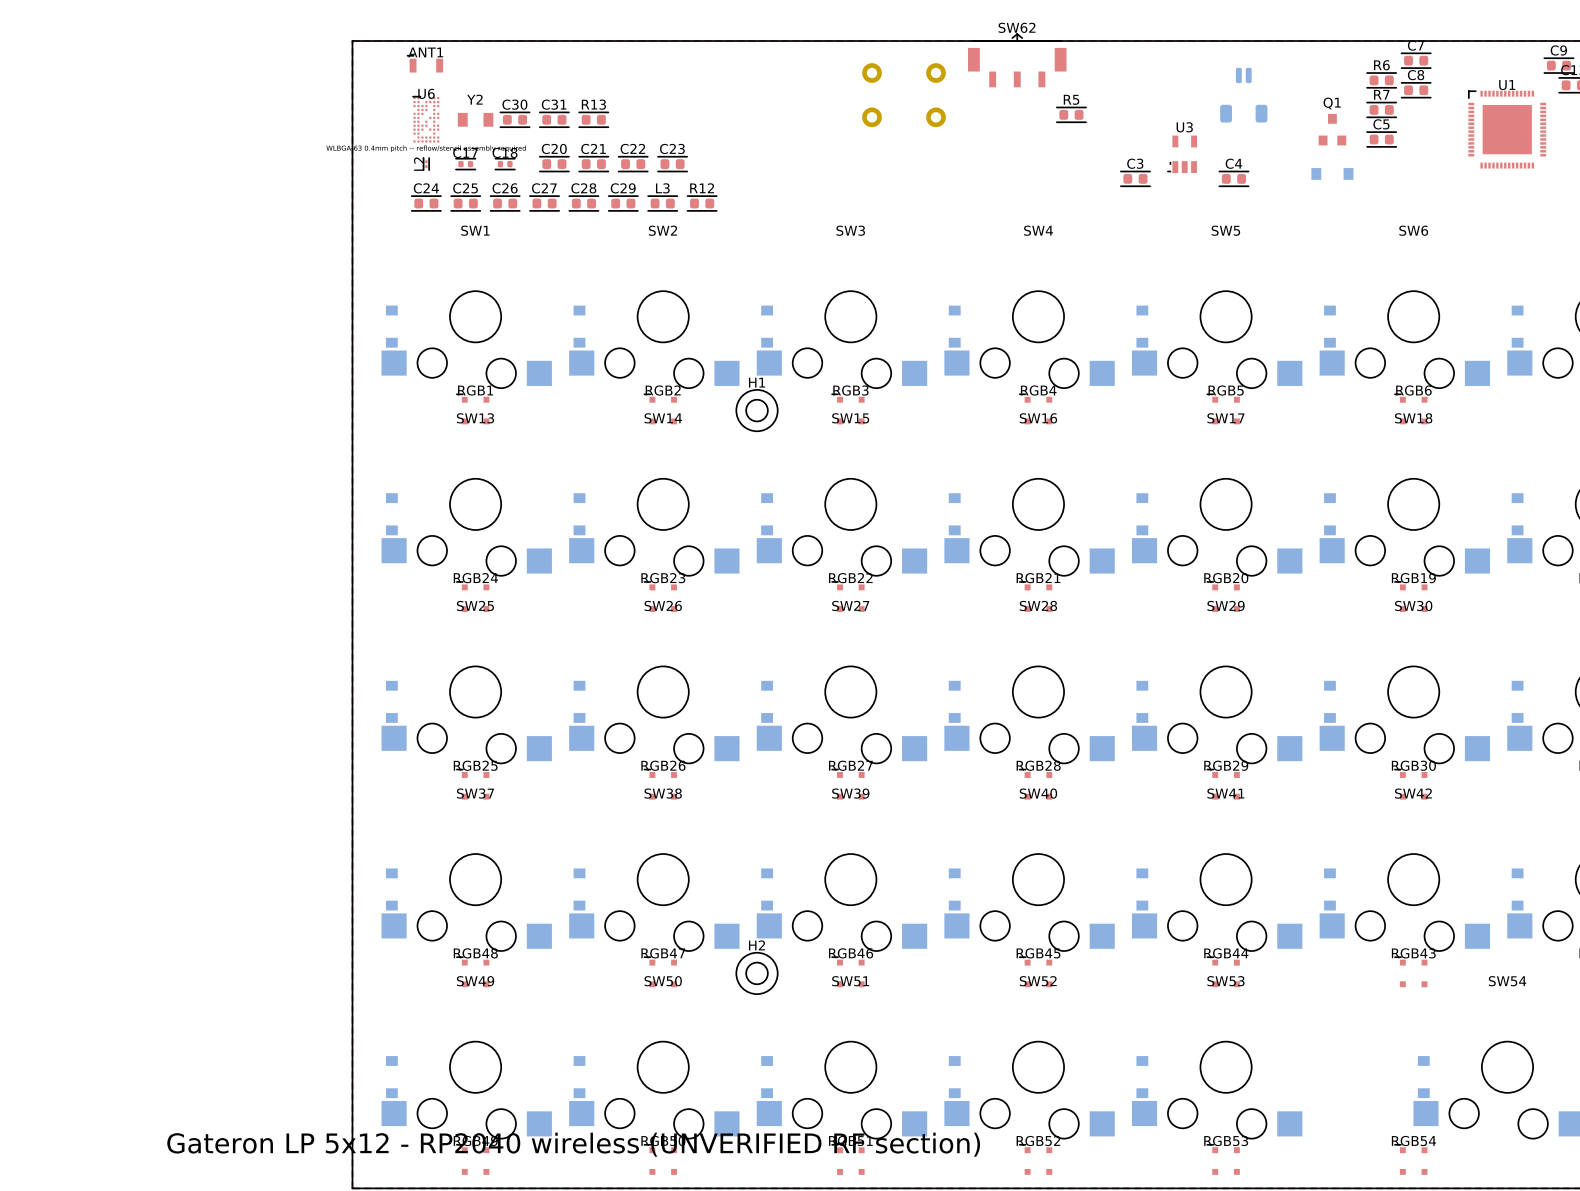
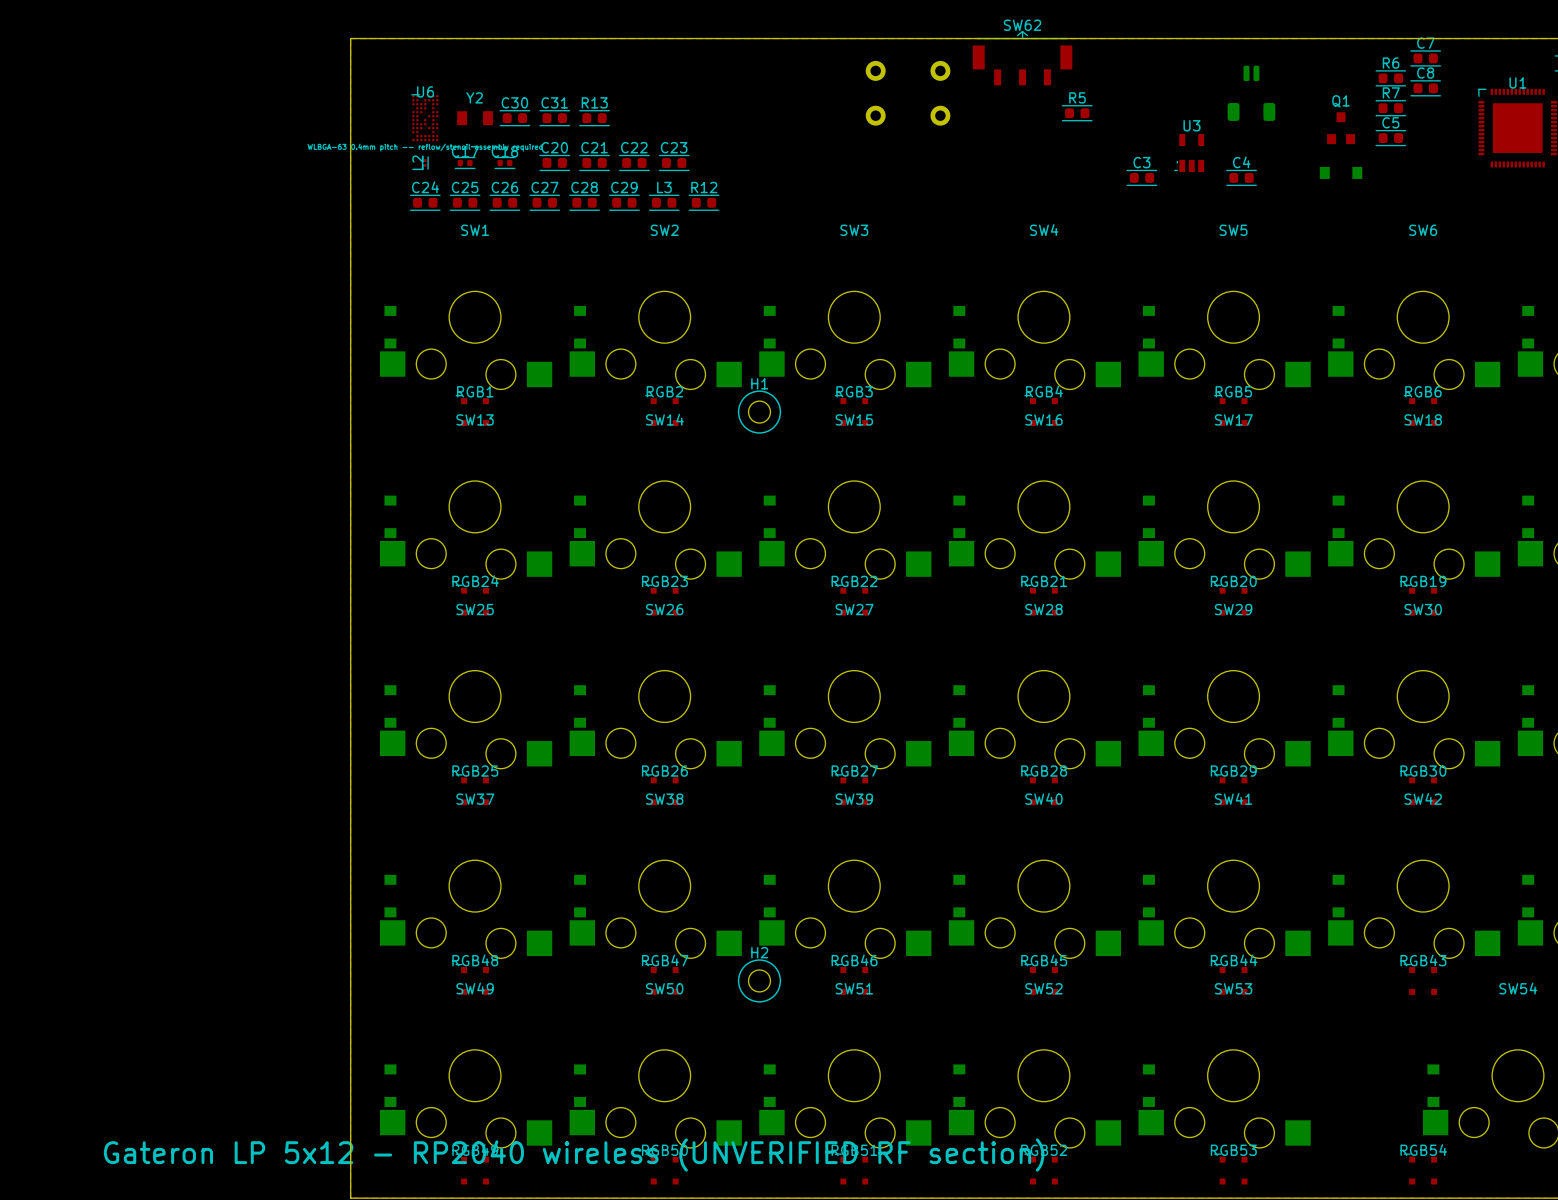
ANT1: (425, 63) -> none

